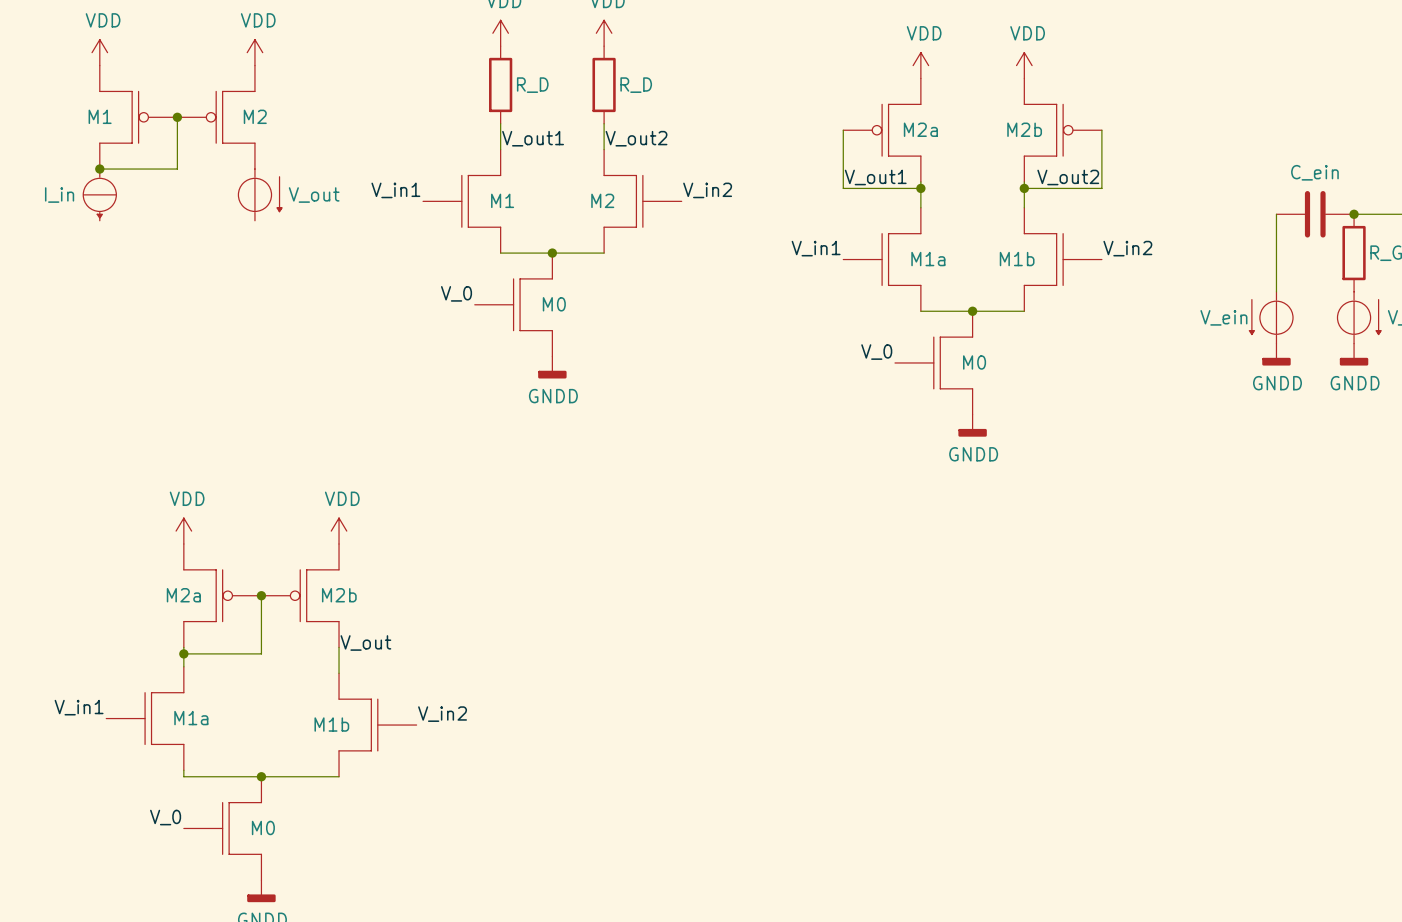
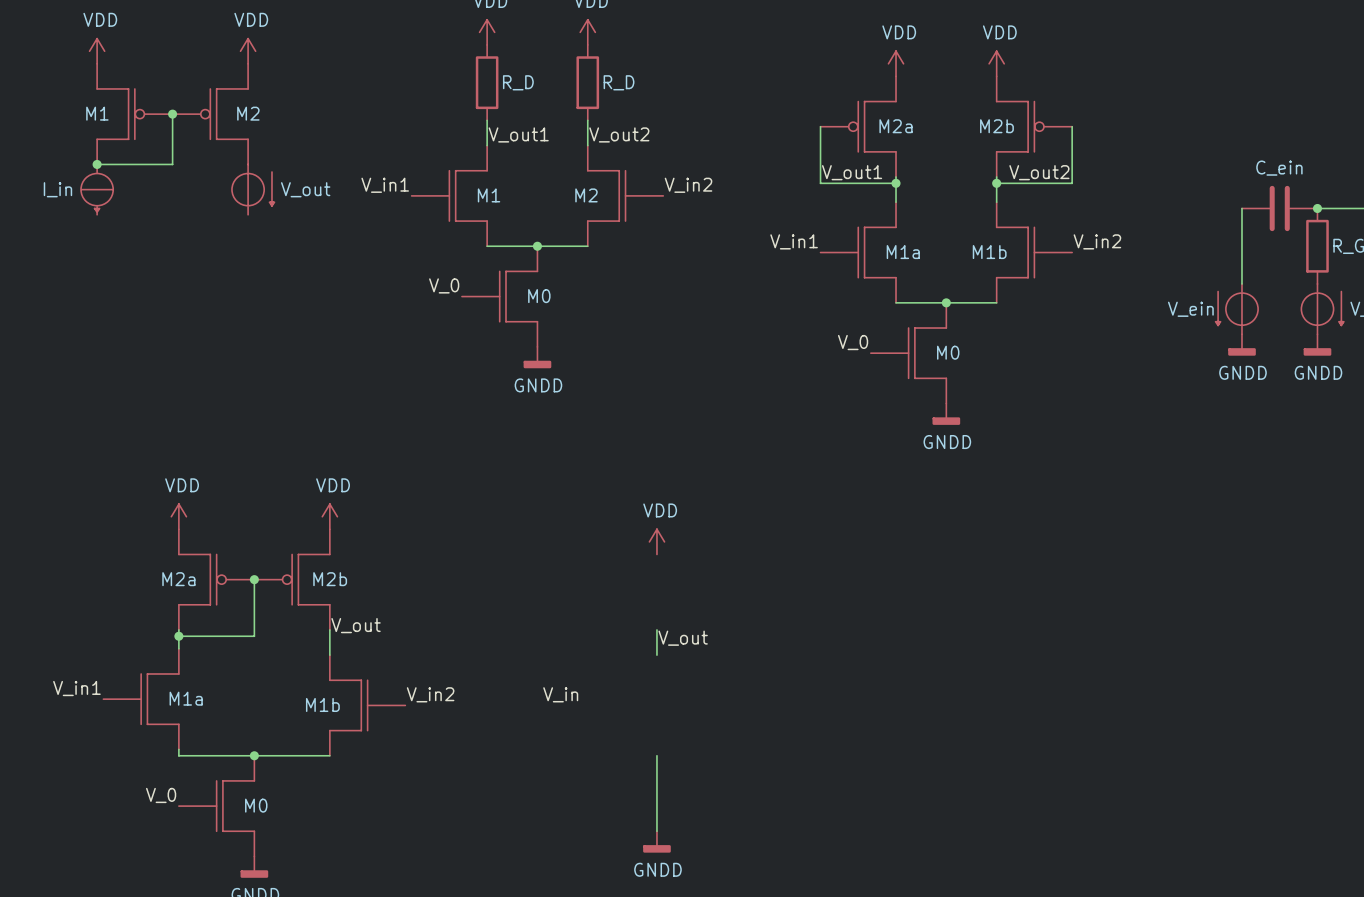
power symbol: none -> VDD (656, 541)
wire: none -> (656, 629) (656, 655)
label: none -> V_out (683, 638)
label: none -> V_in (560, 694)
wire: none -> (656, 755) (656, 831)
power symbol: none -> GNDD (656, 841)

